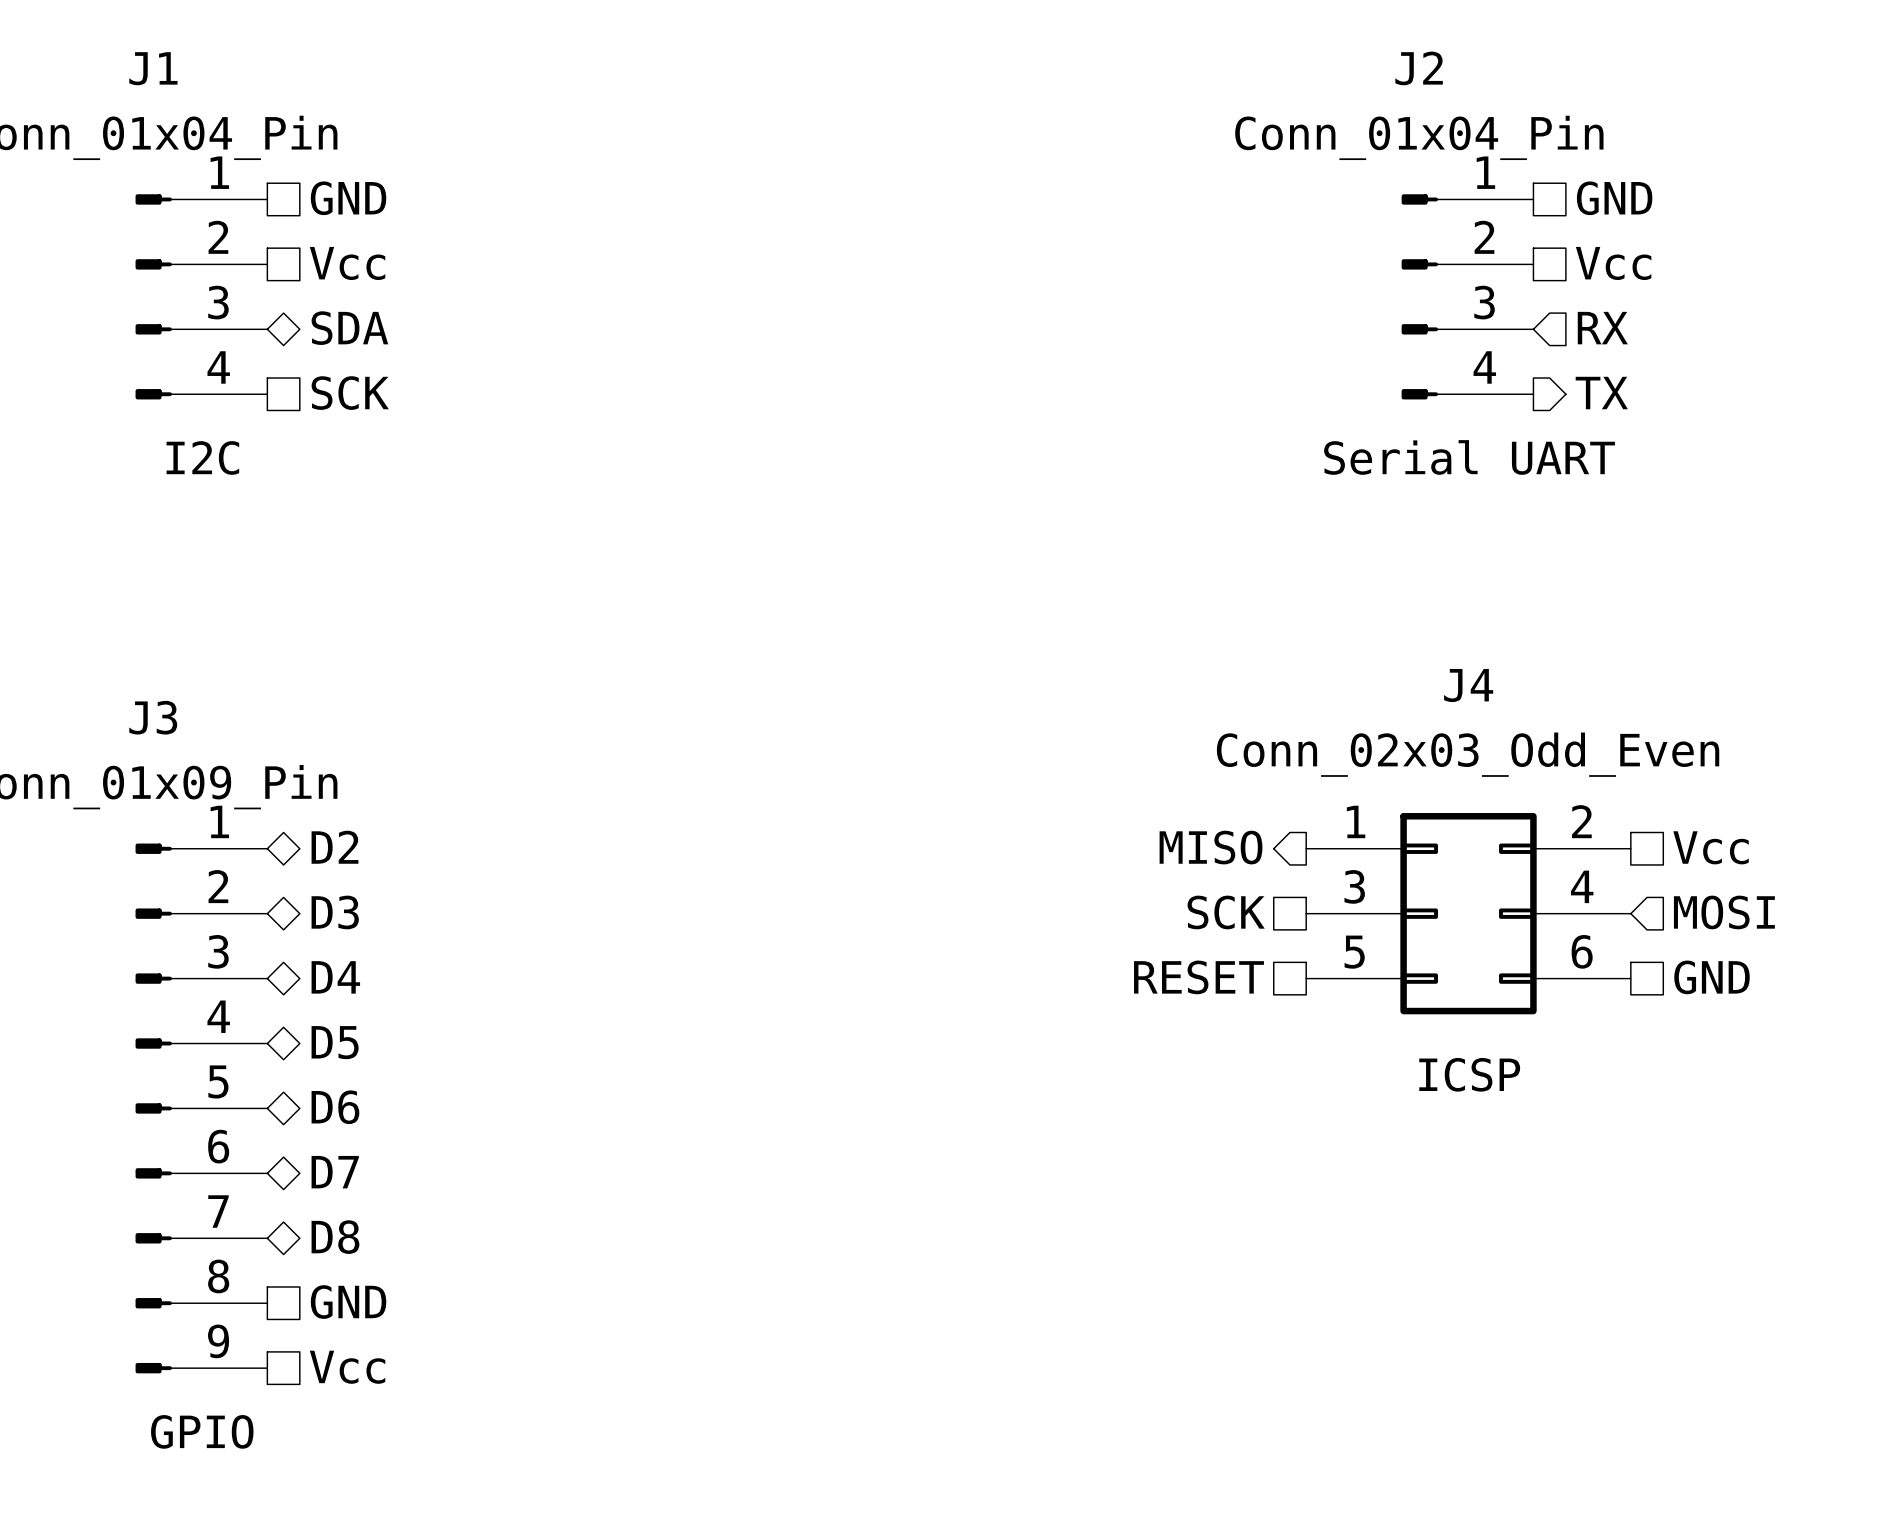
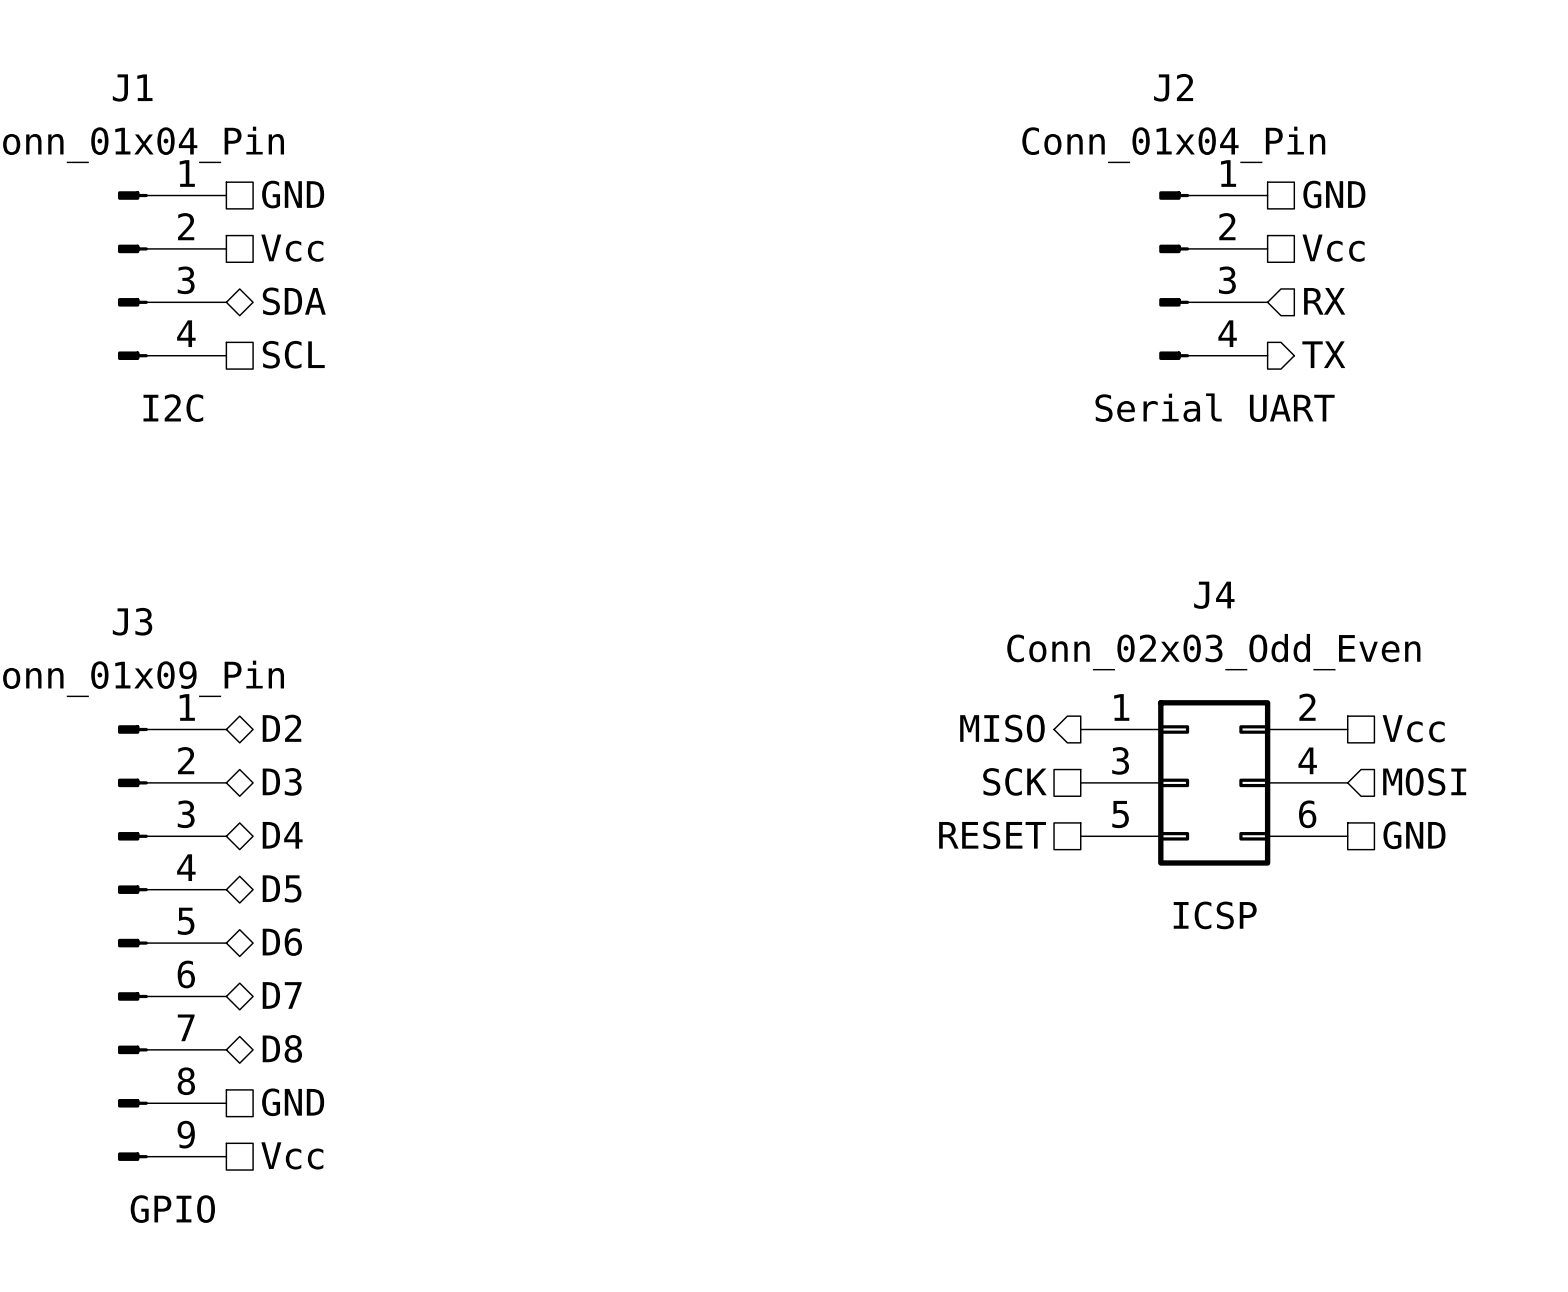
hierarchical label: SCK (350, 393) -> SCL (293, 354)

